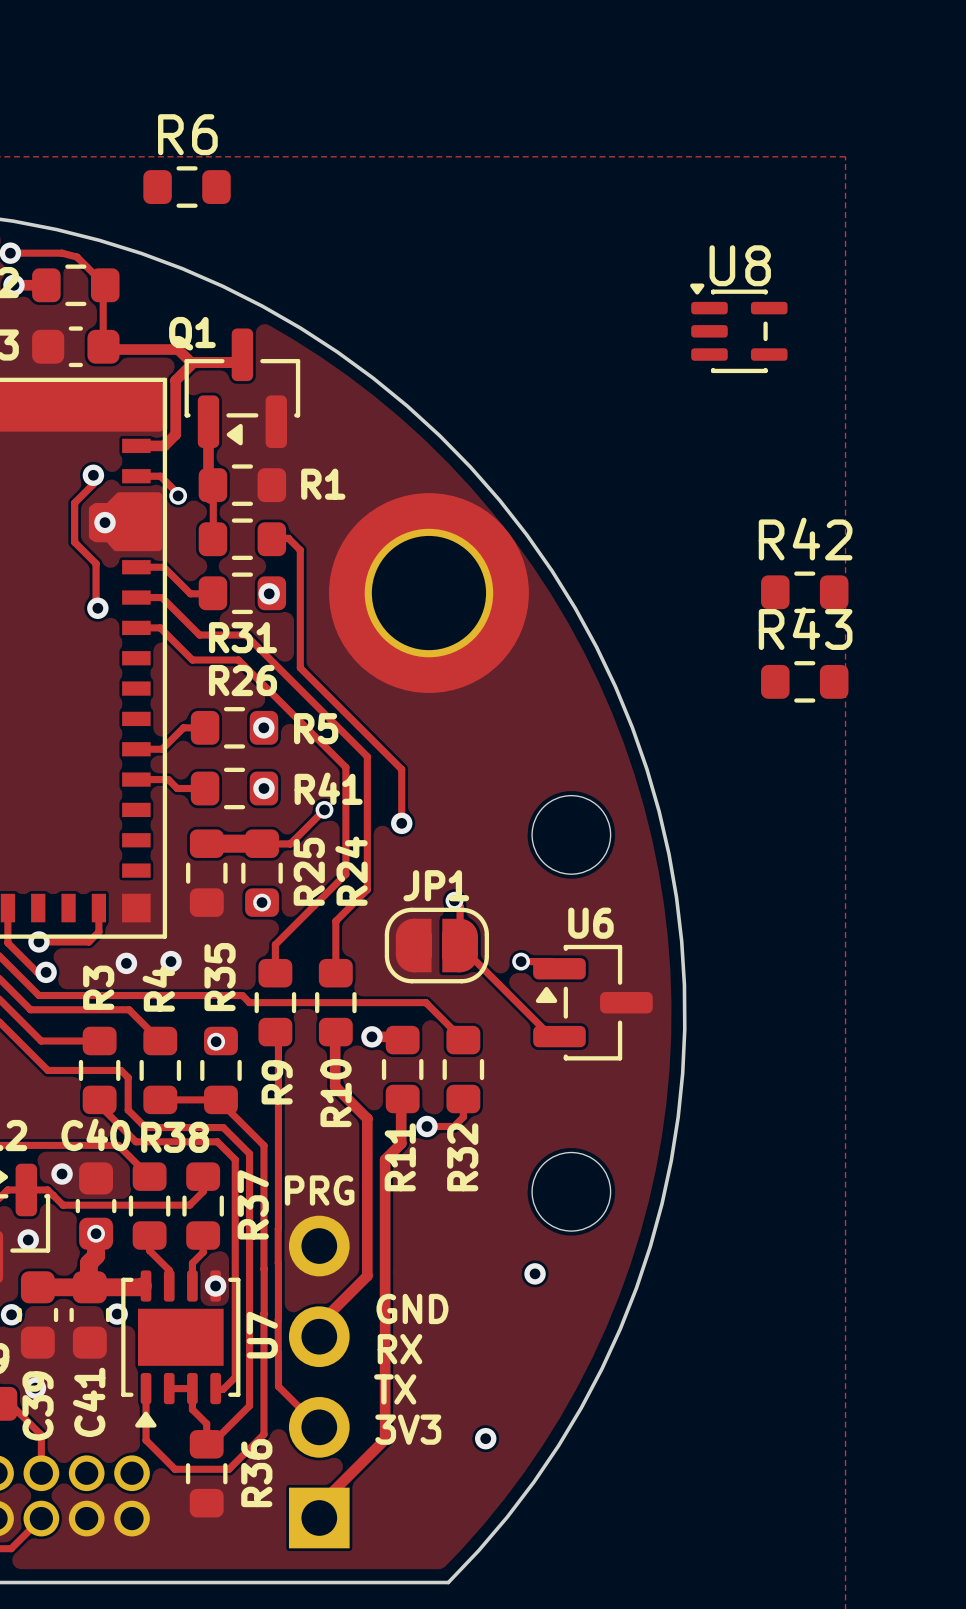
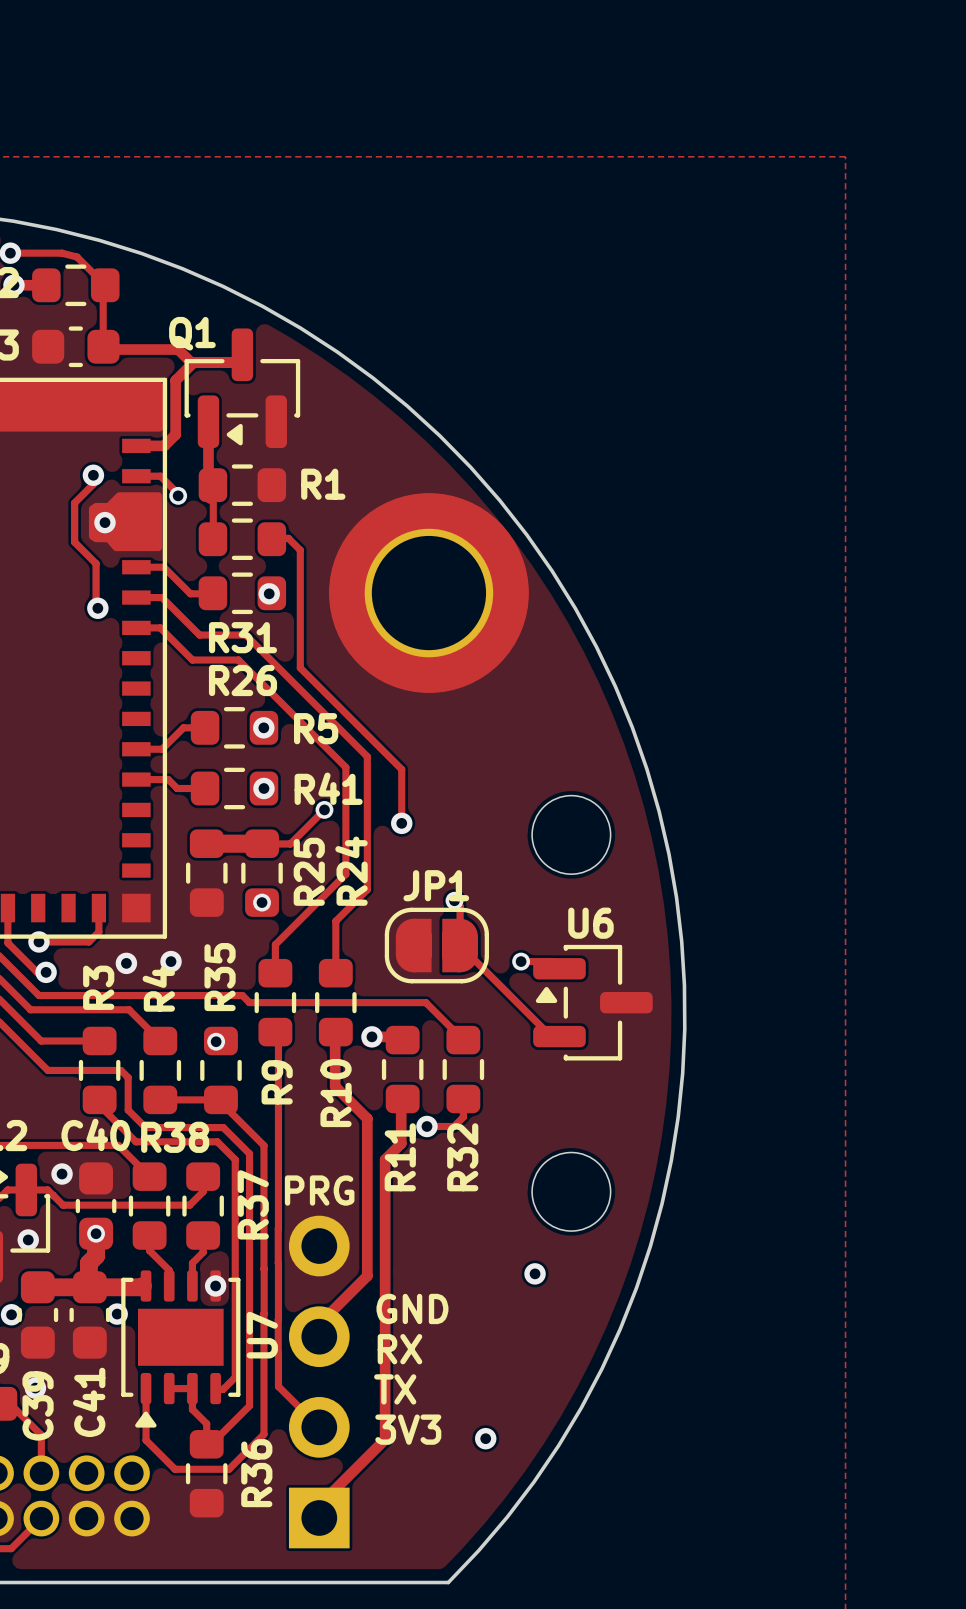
R6: (187, 187) -> none
U8: (738, 328) -> none
R42: (804, 592) -> none
R43: (804, 681) -> none

